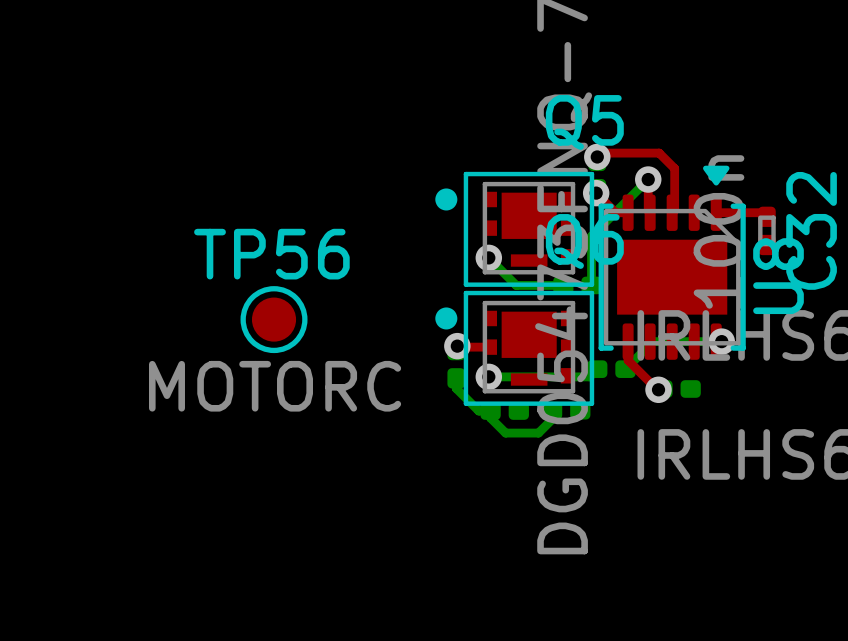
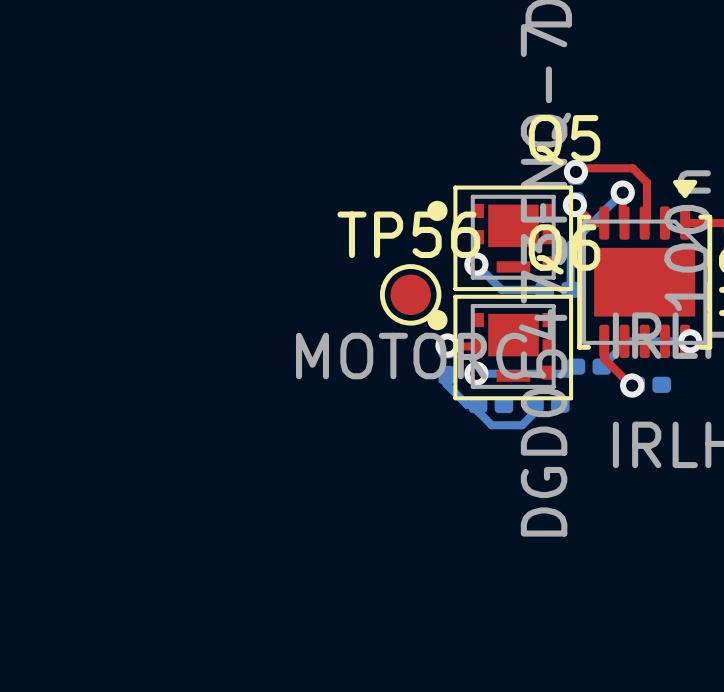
TP56 position: (274, 319) -> (410, 294)

